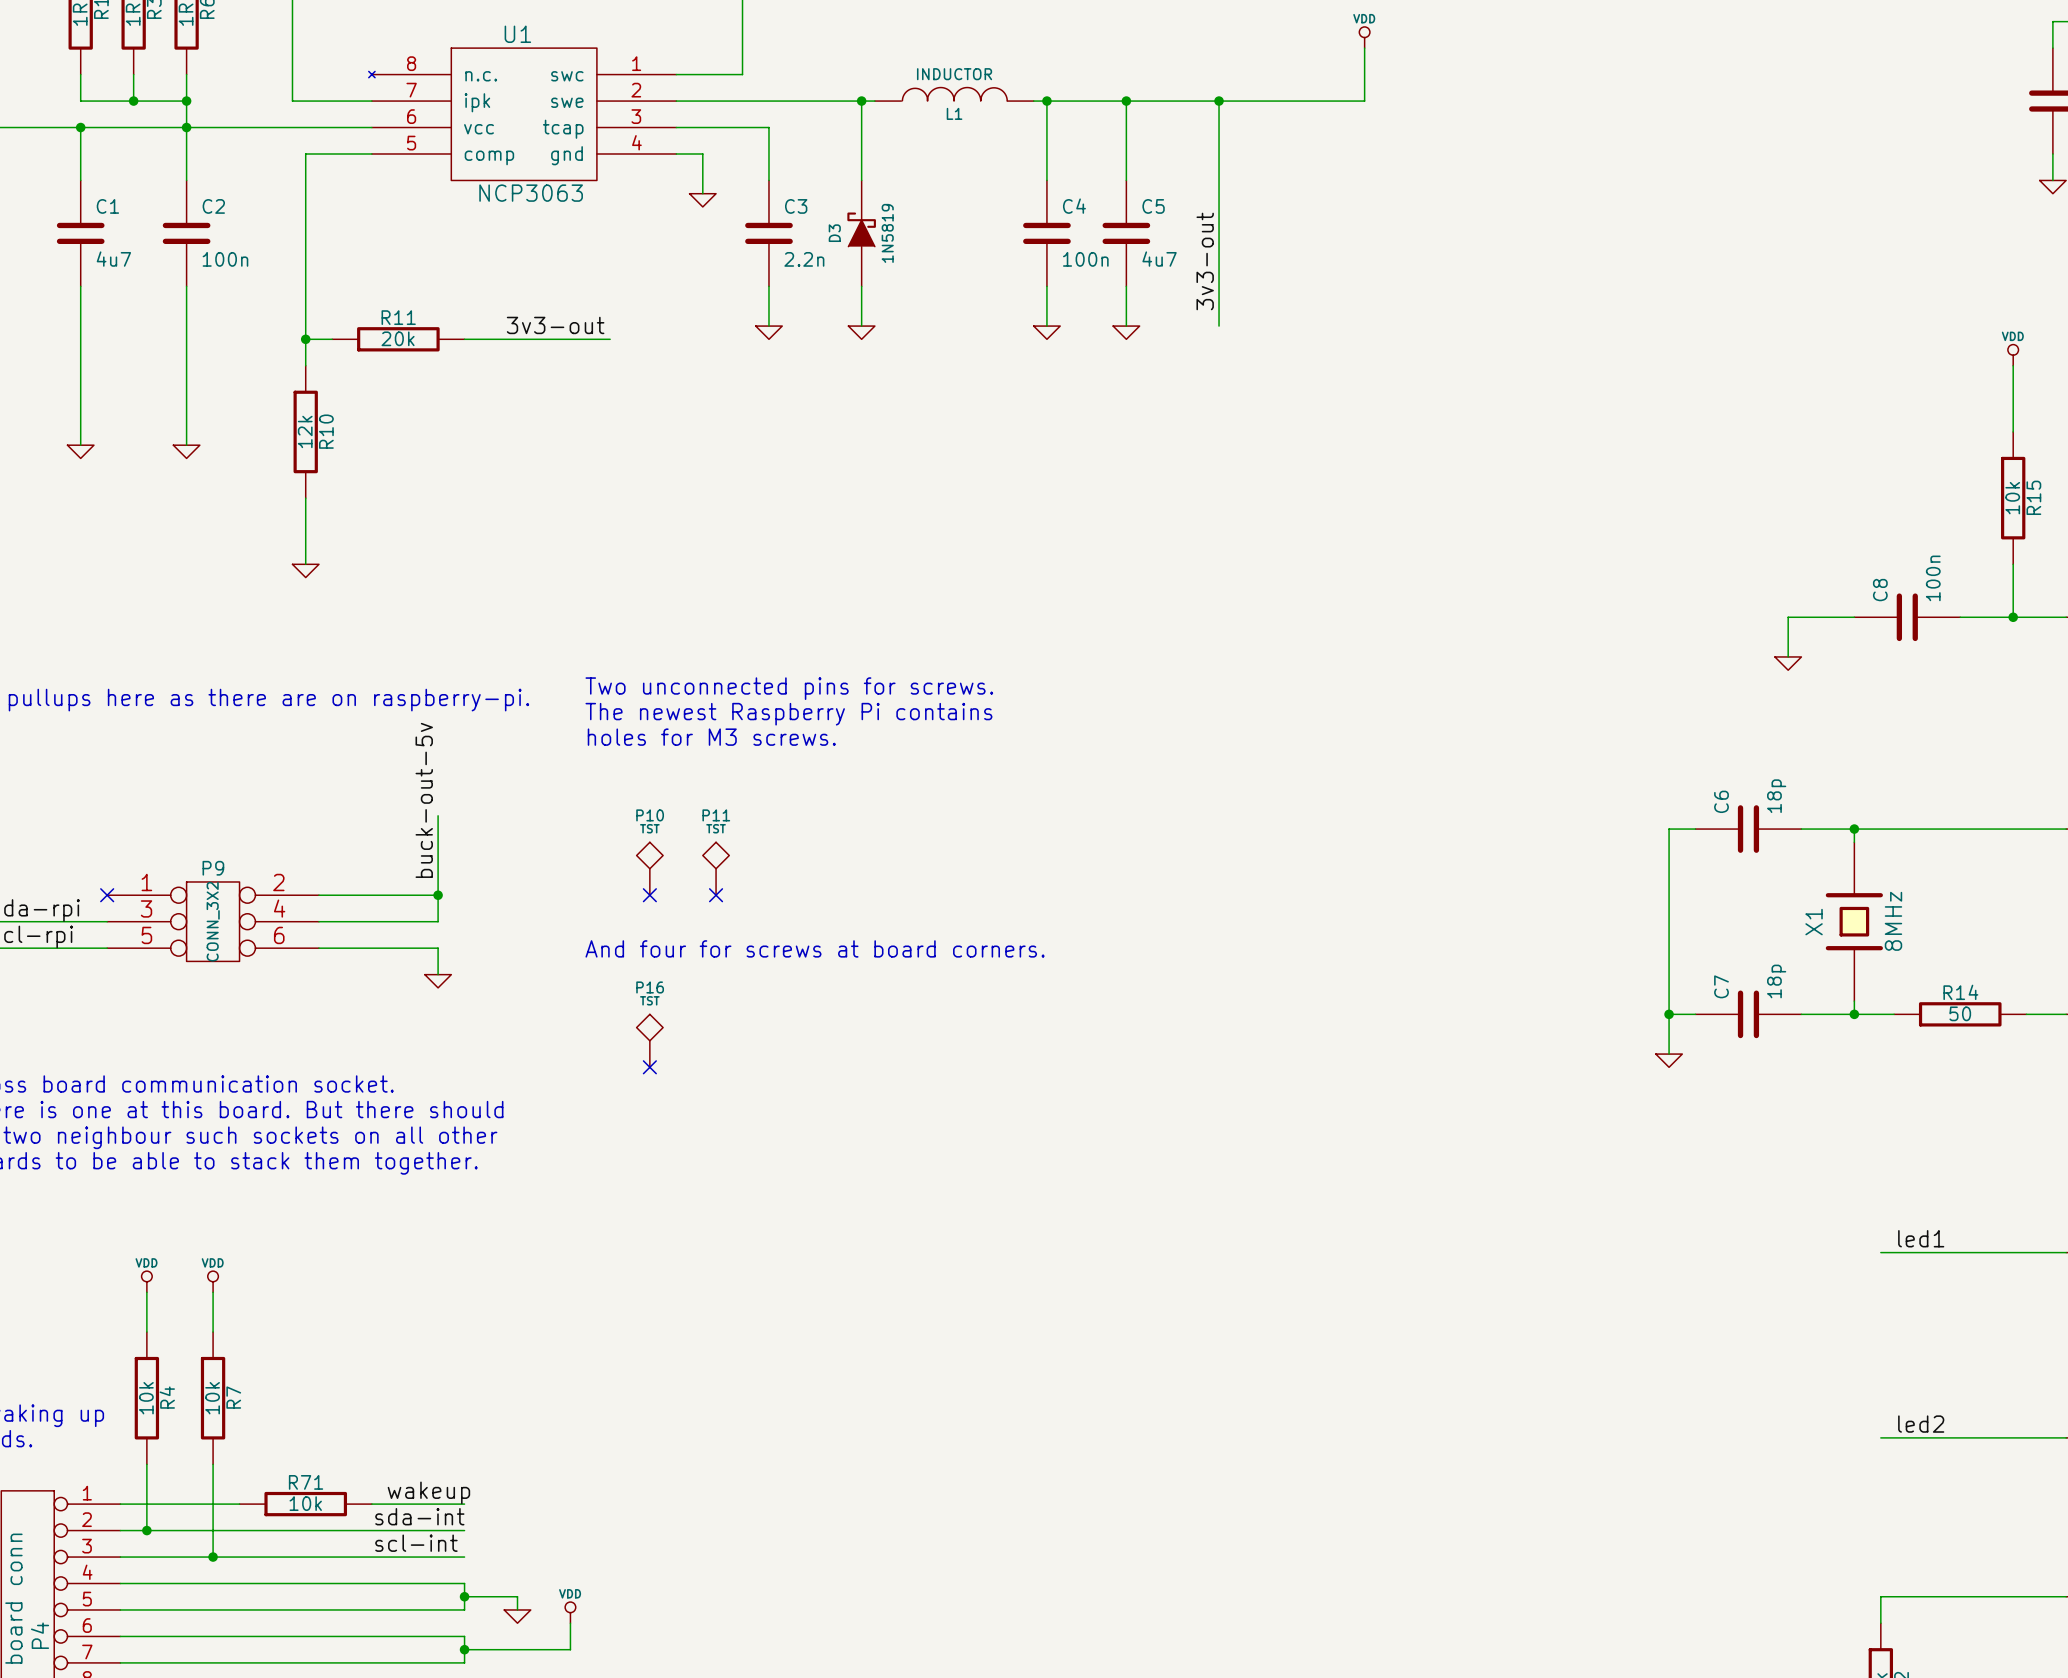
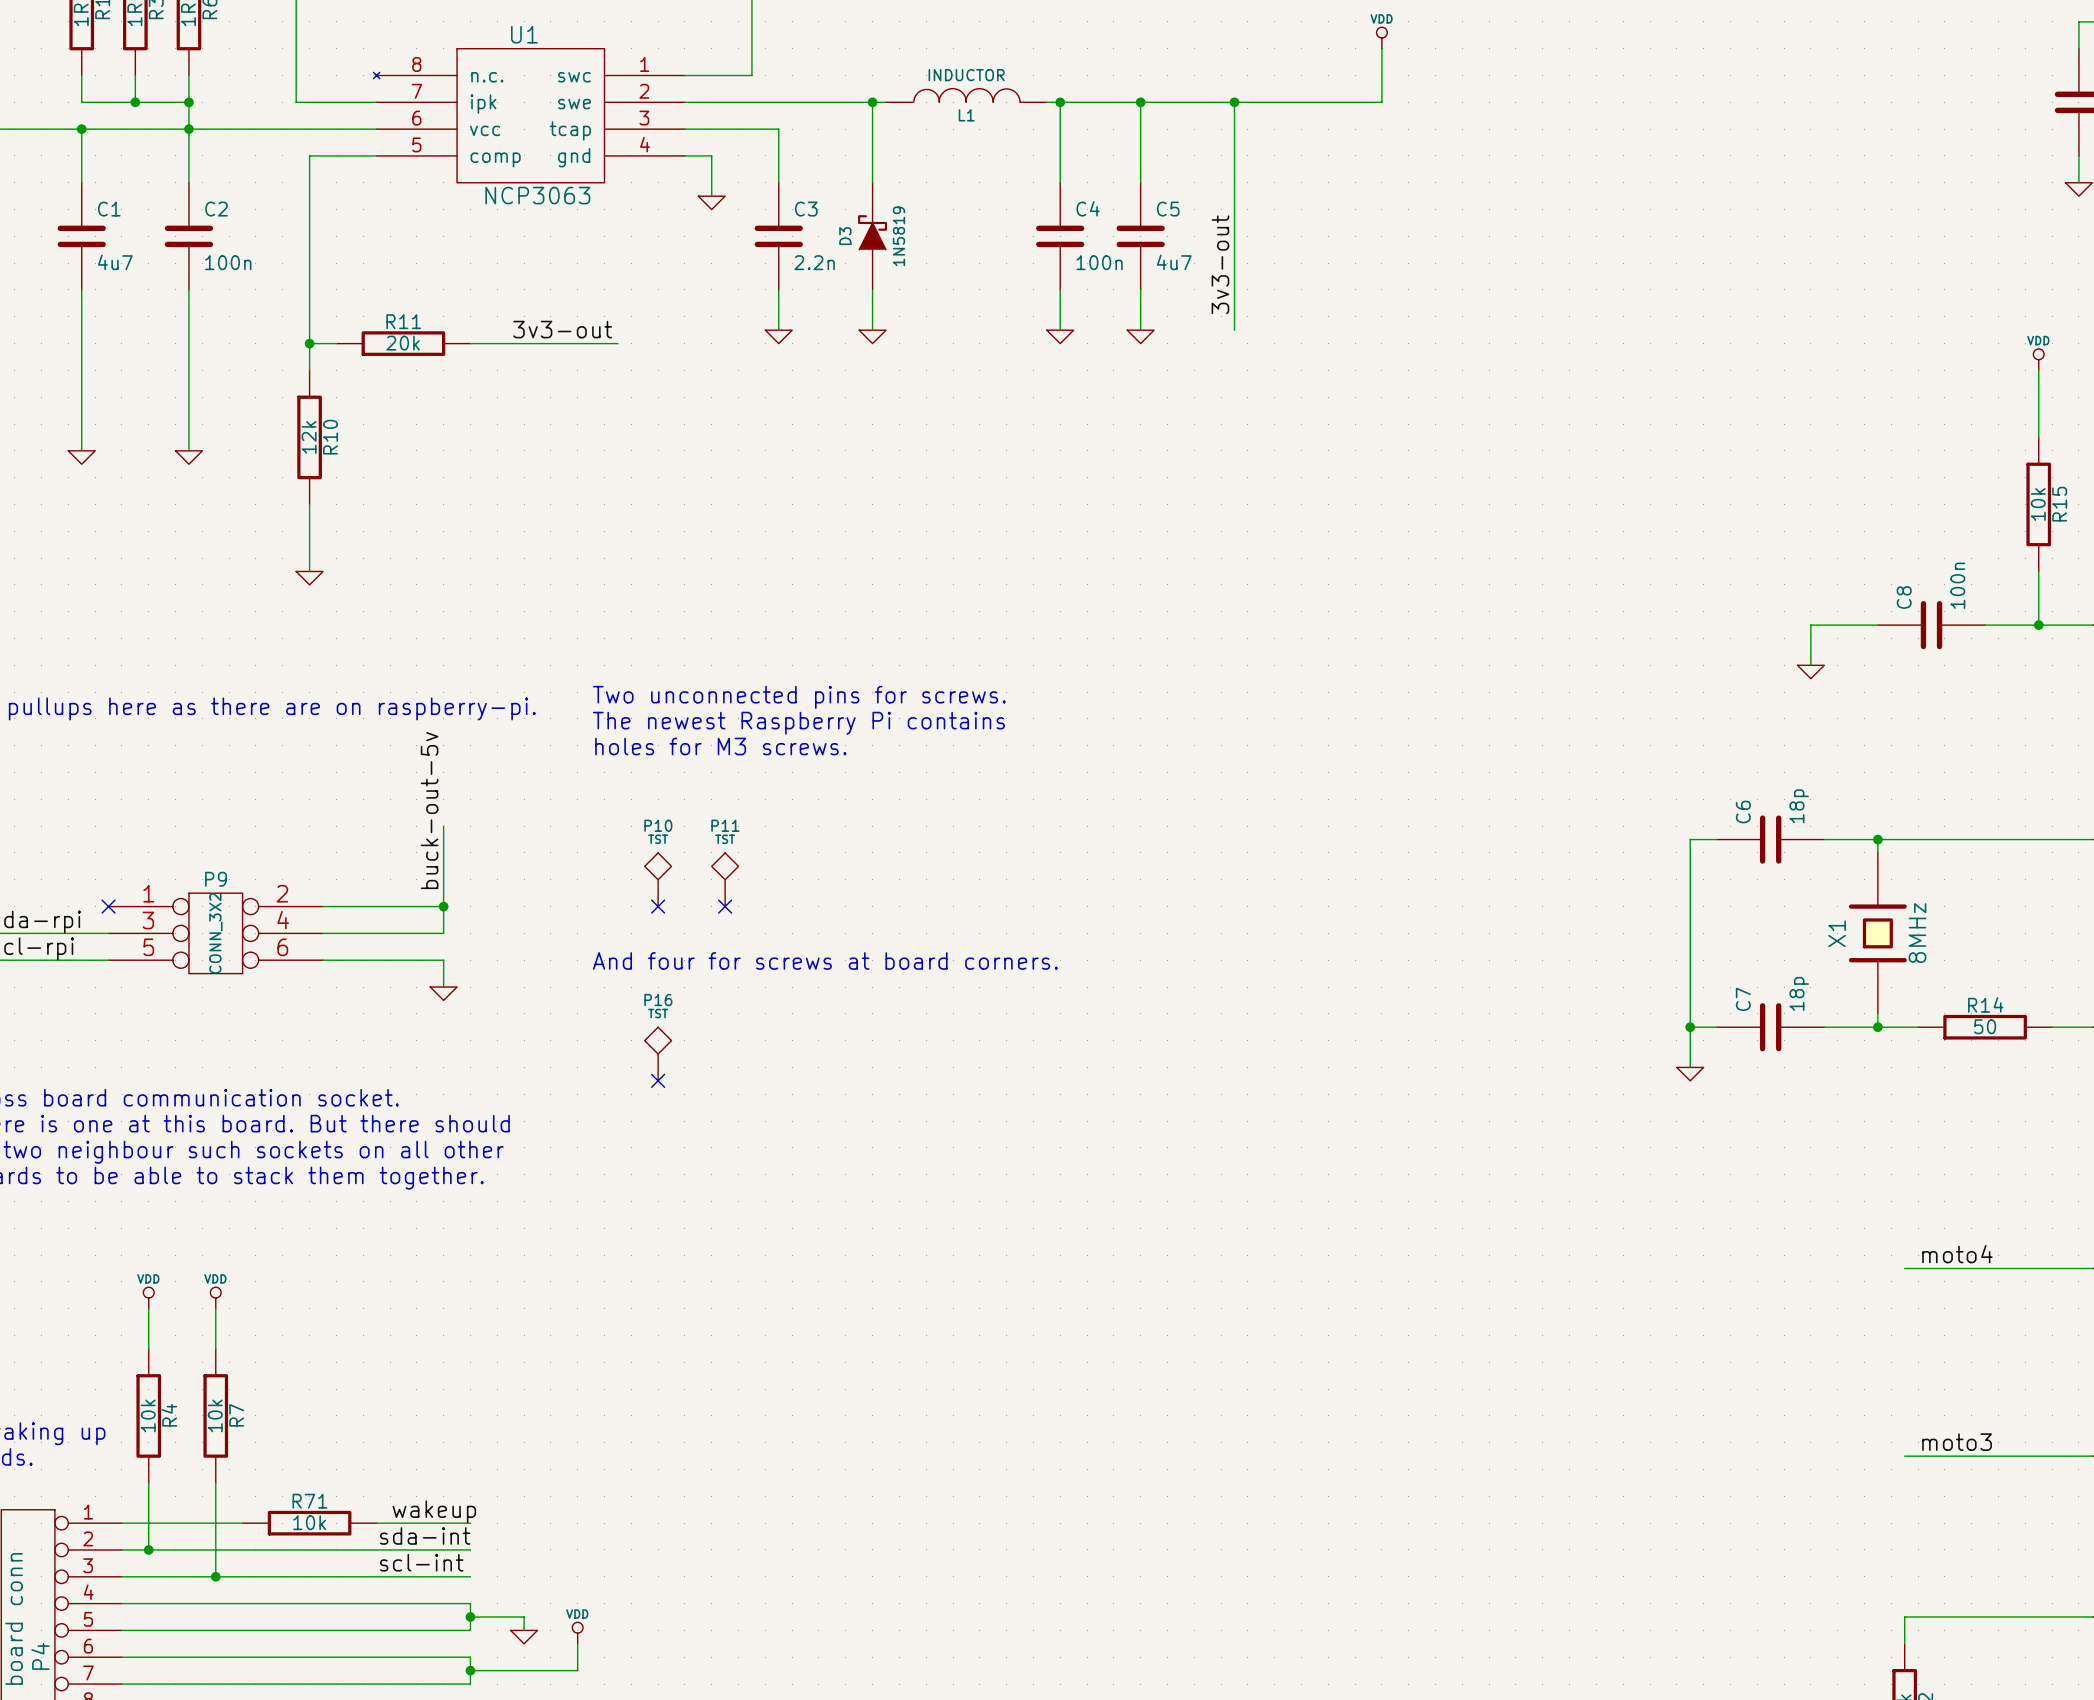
label: led1 (1921, 1238) -> moto4 (1957, 1254)
label: led2 (1921, 1424) -> moto3 (1957, 1442)

